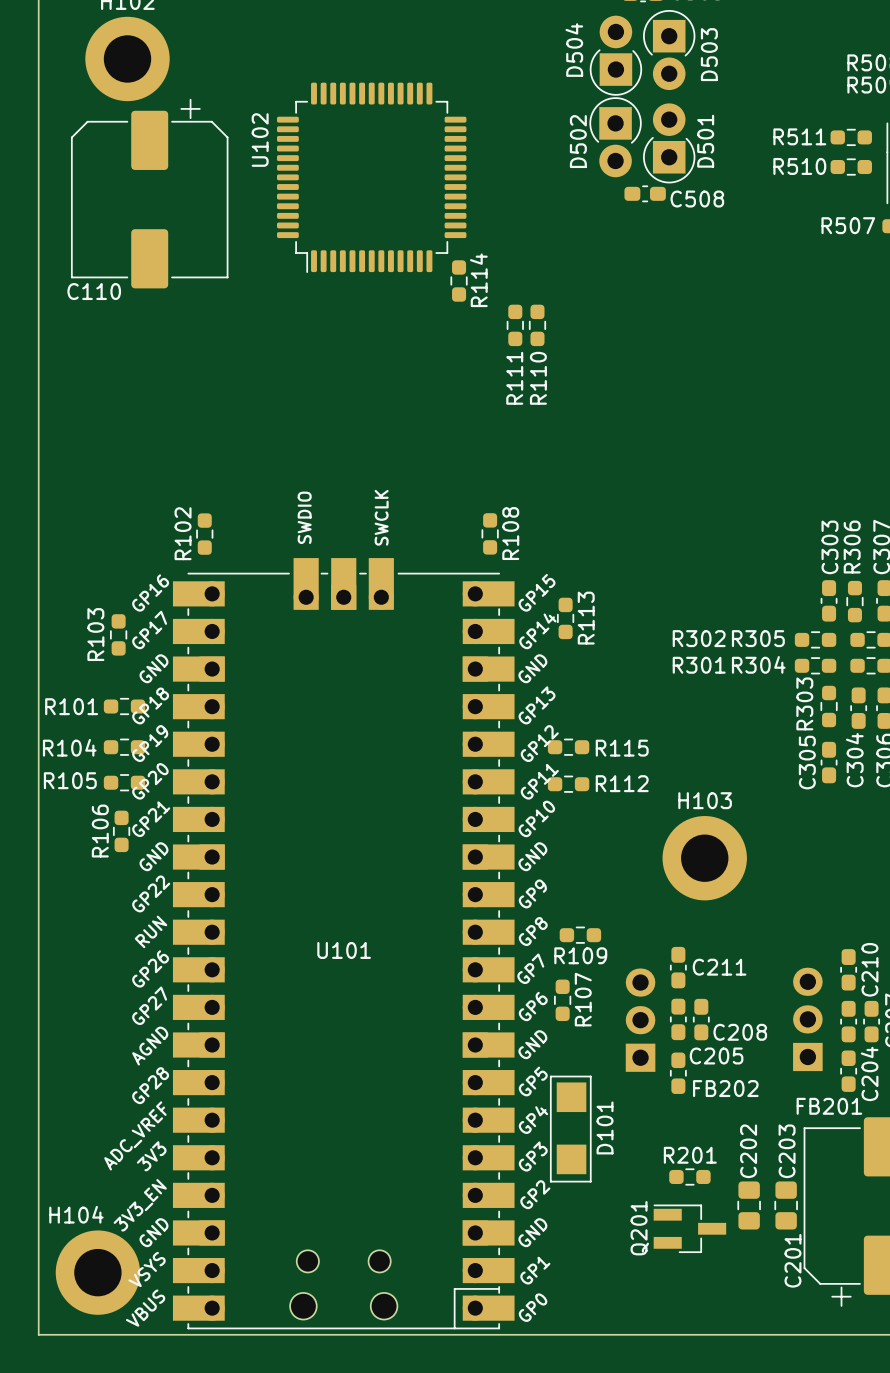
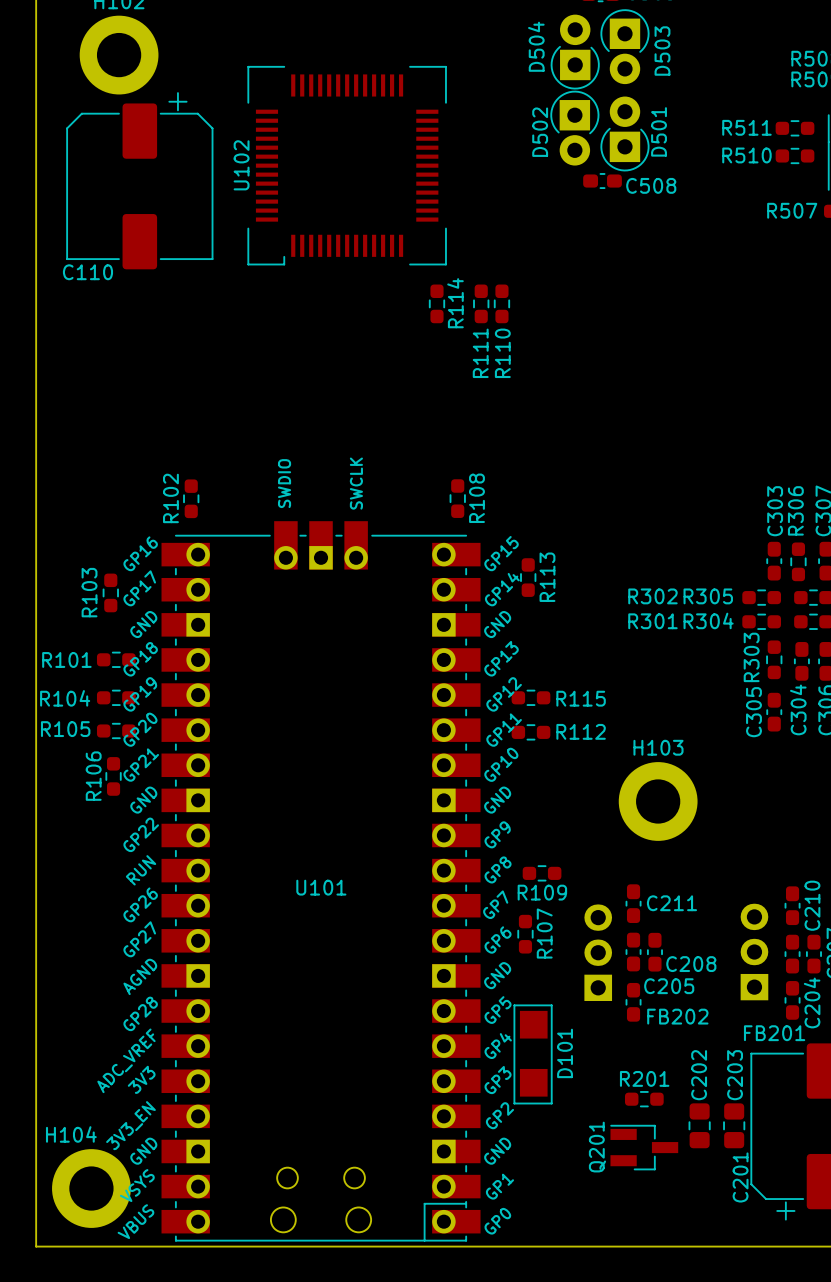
U102 footprint: [276, 82, 467, 273] -> [247, 65, 447, 266]
U102 name position: U102 (260, 140) -> U102 (241, 165)
R114 position: (459, 280) -> (436, 303)

